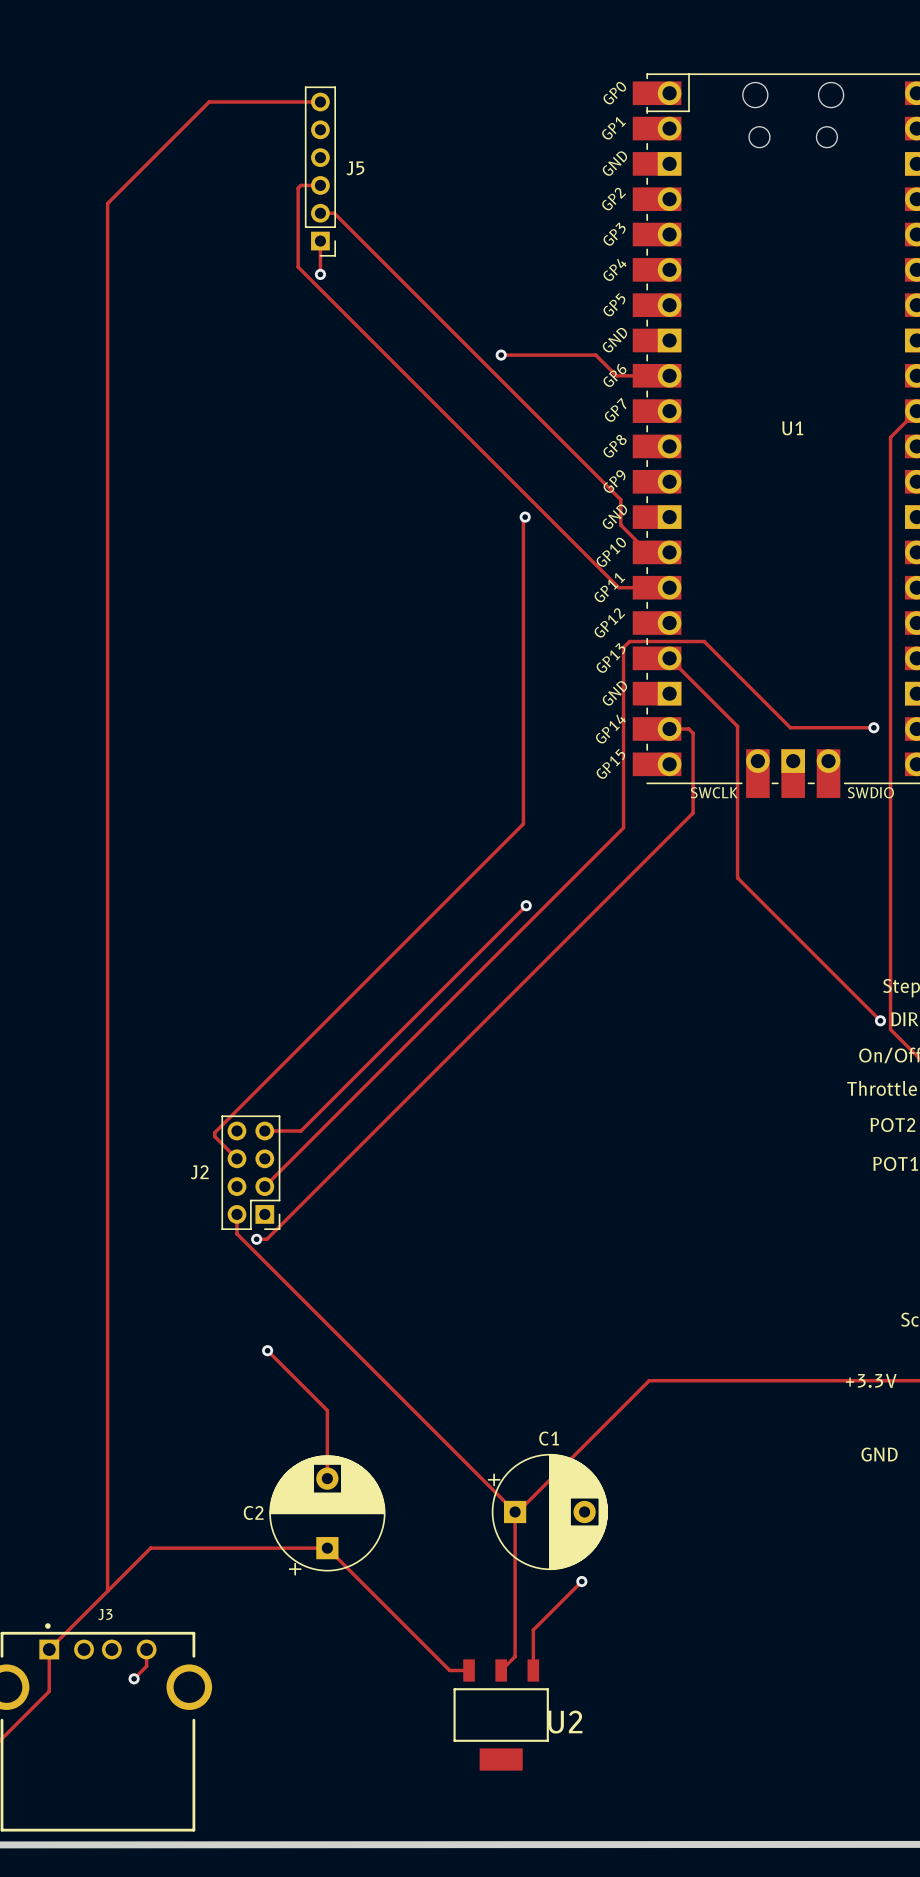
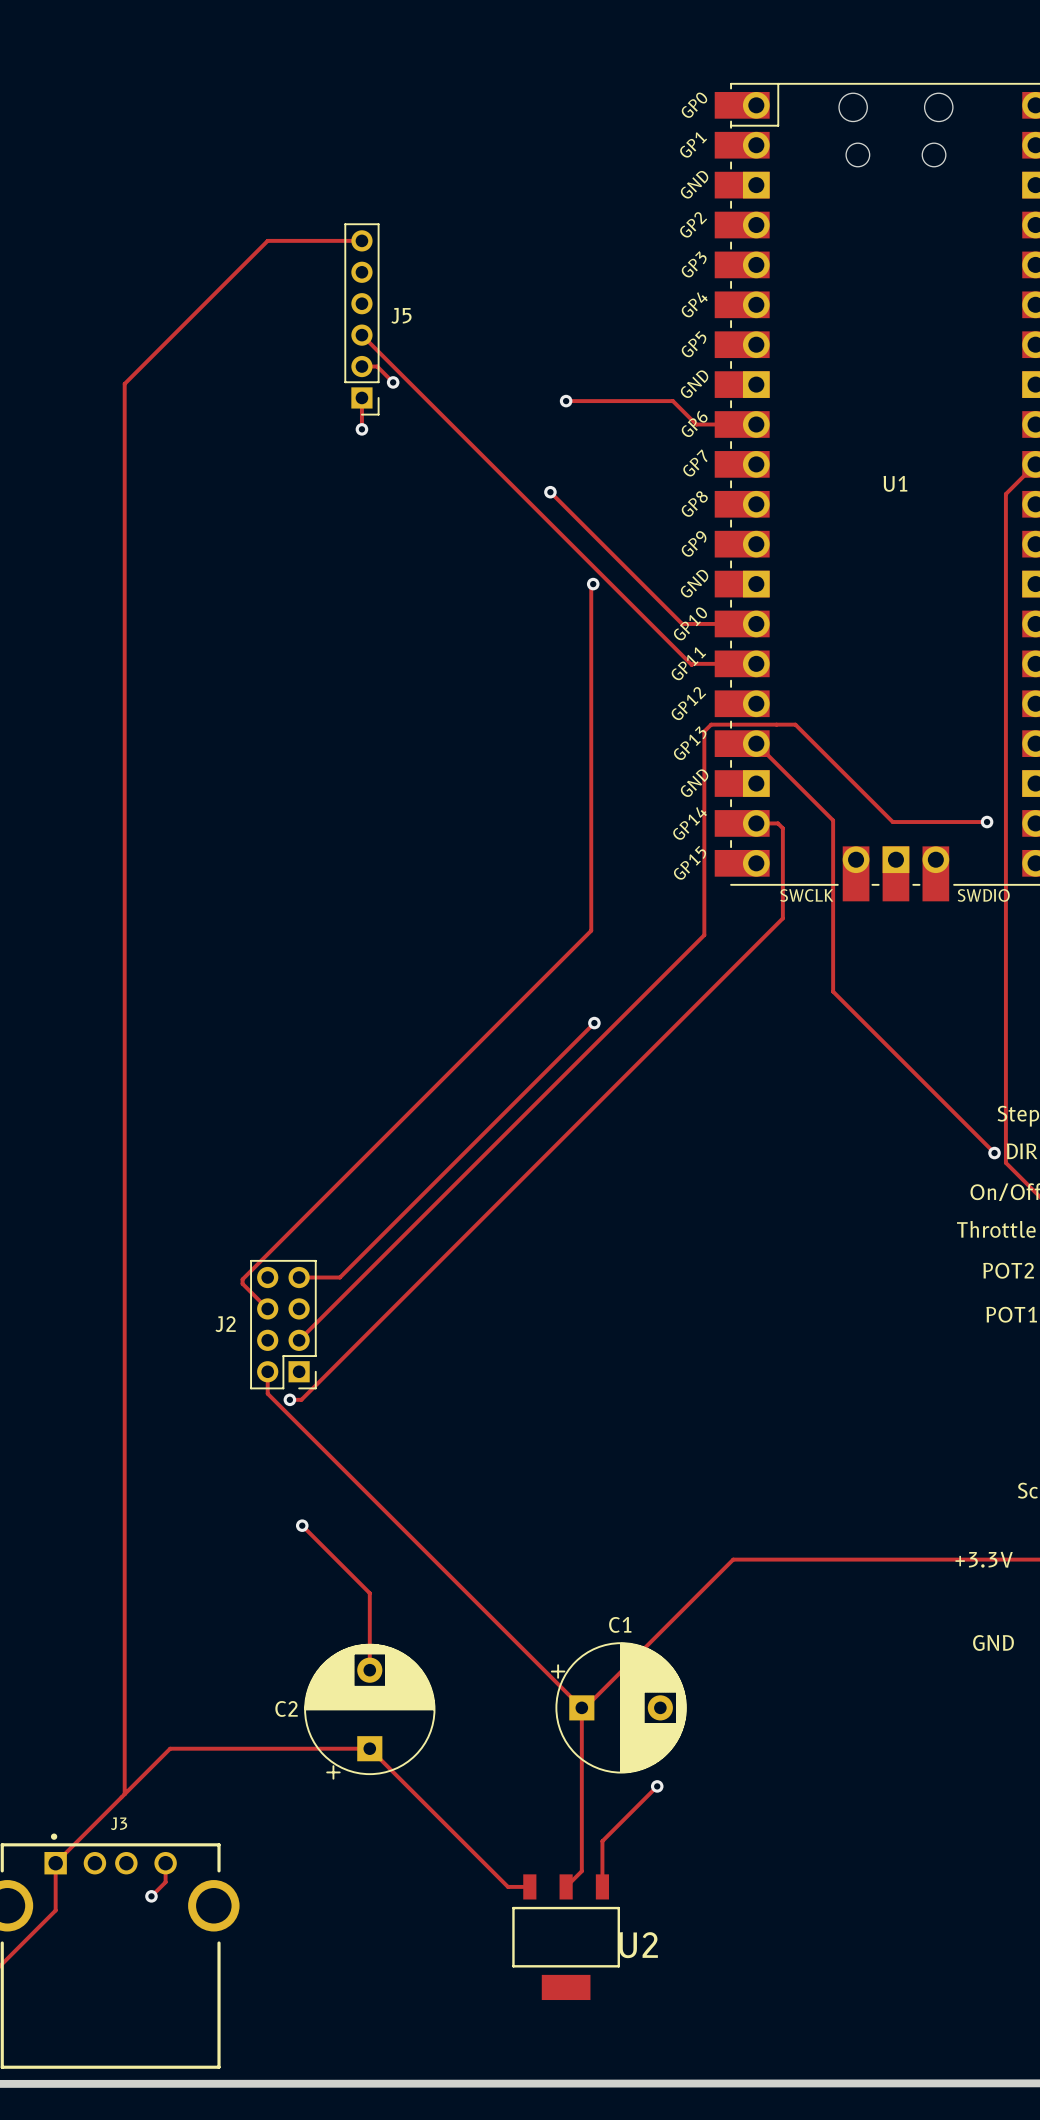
track: (320, 102) (209, 102) (107, 203) (107, 1591) -> none
J5 position: (320, 171) -> (361, 319)
track: (320, 185) (300, 185) (298, 188) (298, 267) (618, 587) -> (361, 335) (691, 664) (698, 663)
track: (320, 213) (334, 213) (620, 499) (620, 525) (648, 552) -> (550, 492) (682, 623) (732, 623)
track: none -> (361, 240) (267, 240) (124, 383) (124, 1794)
track: (320, 241) (320, 274) -> none
via: (320, 274) -> none
track: none -> (361, 366) (377, 366) (393, 382)
via: none -> (393, 382)
track: none -> (361, 397) (361, 429)
via: none -> (361, 429)
via: none -> (550, 492)

